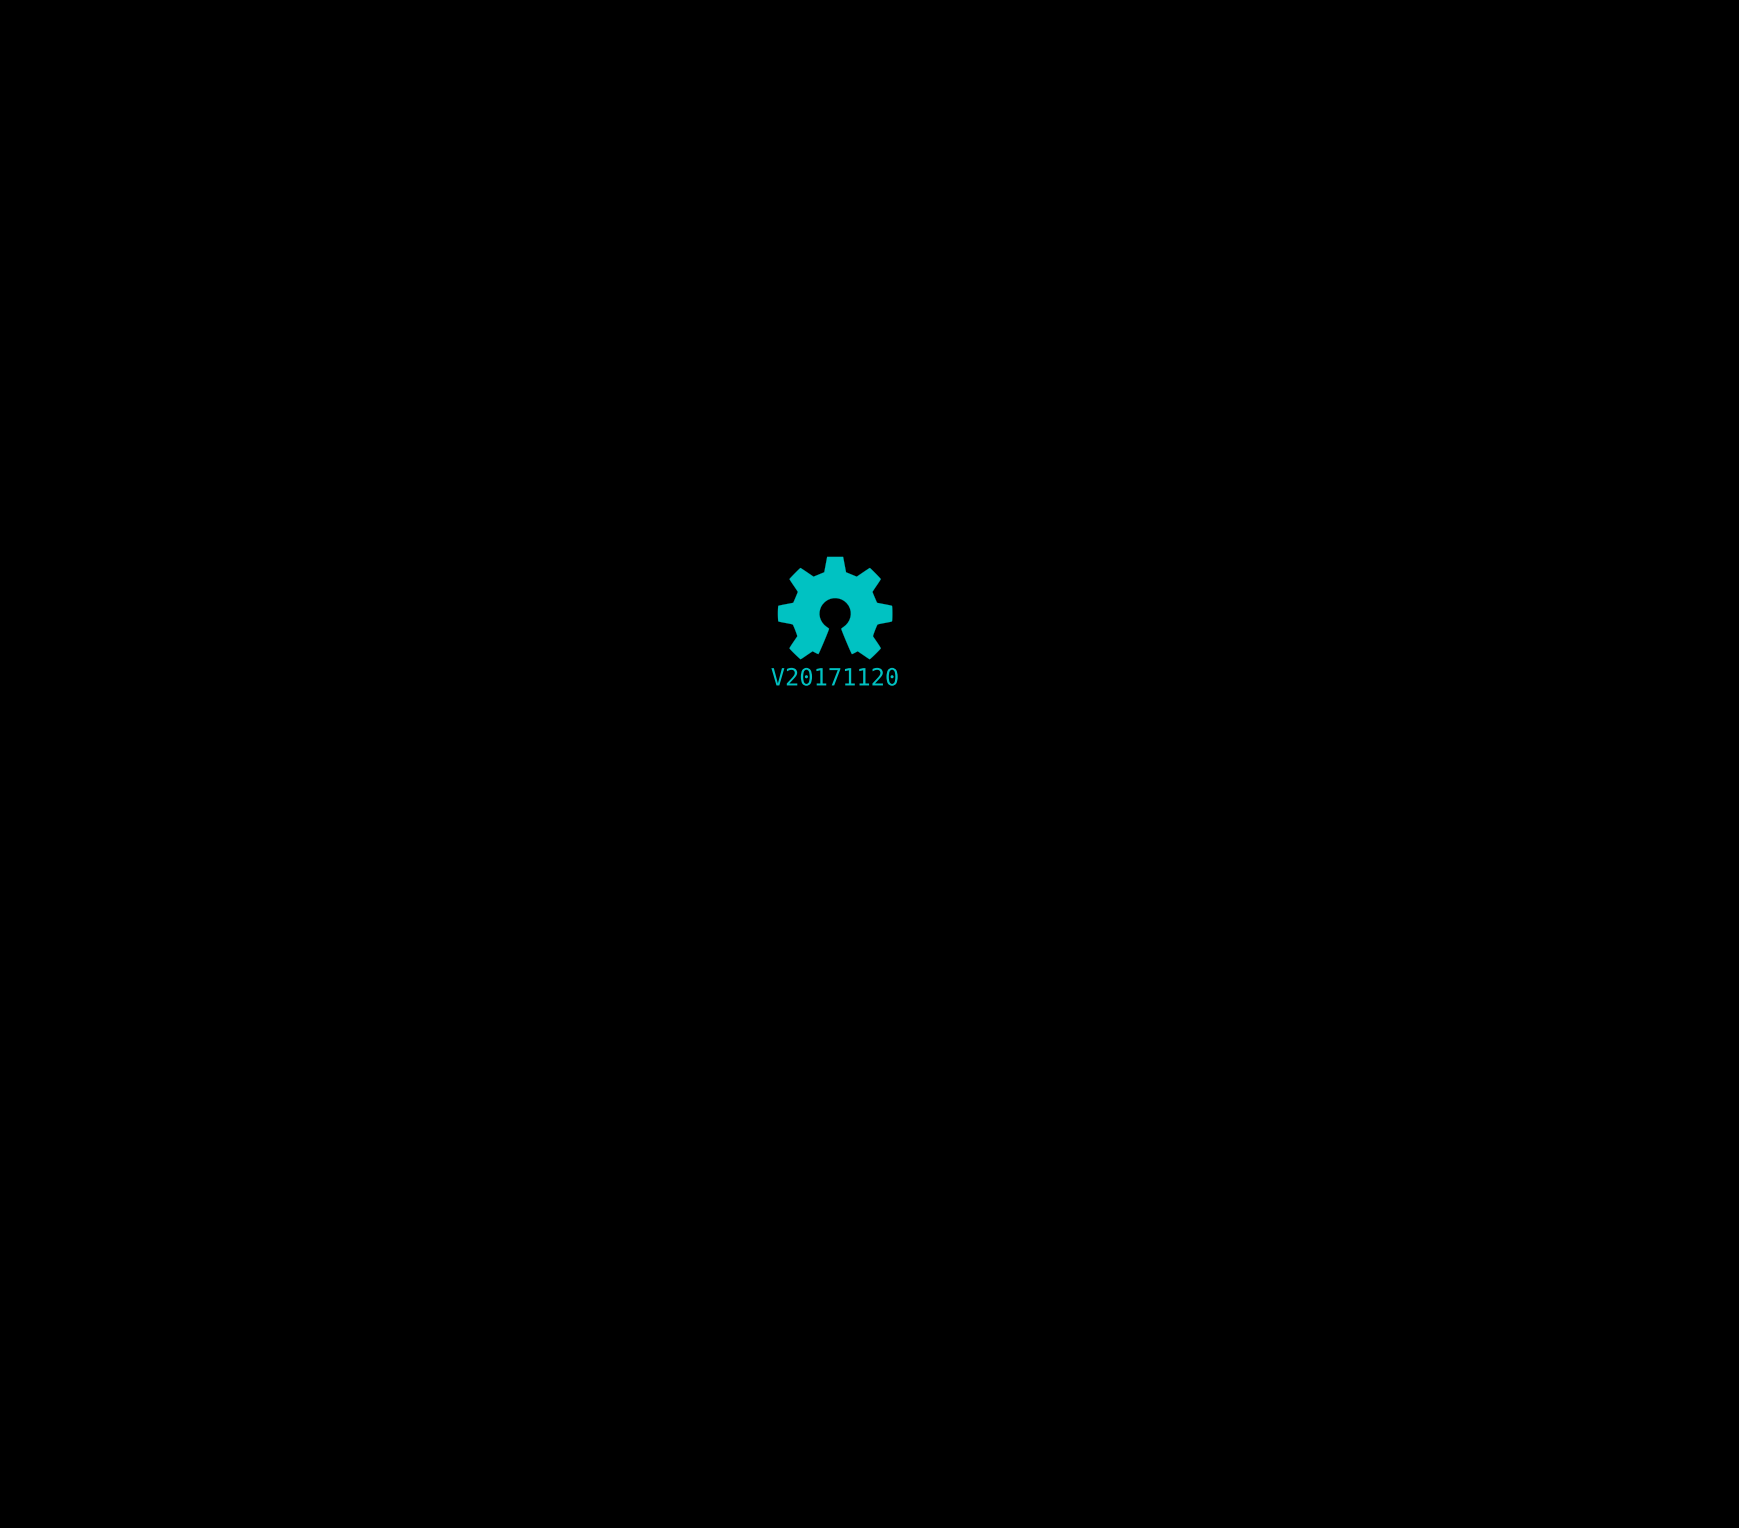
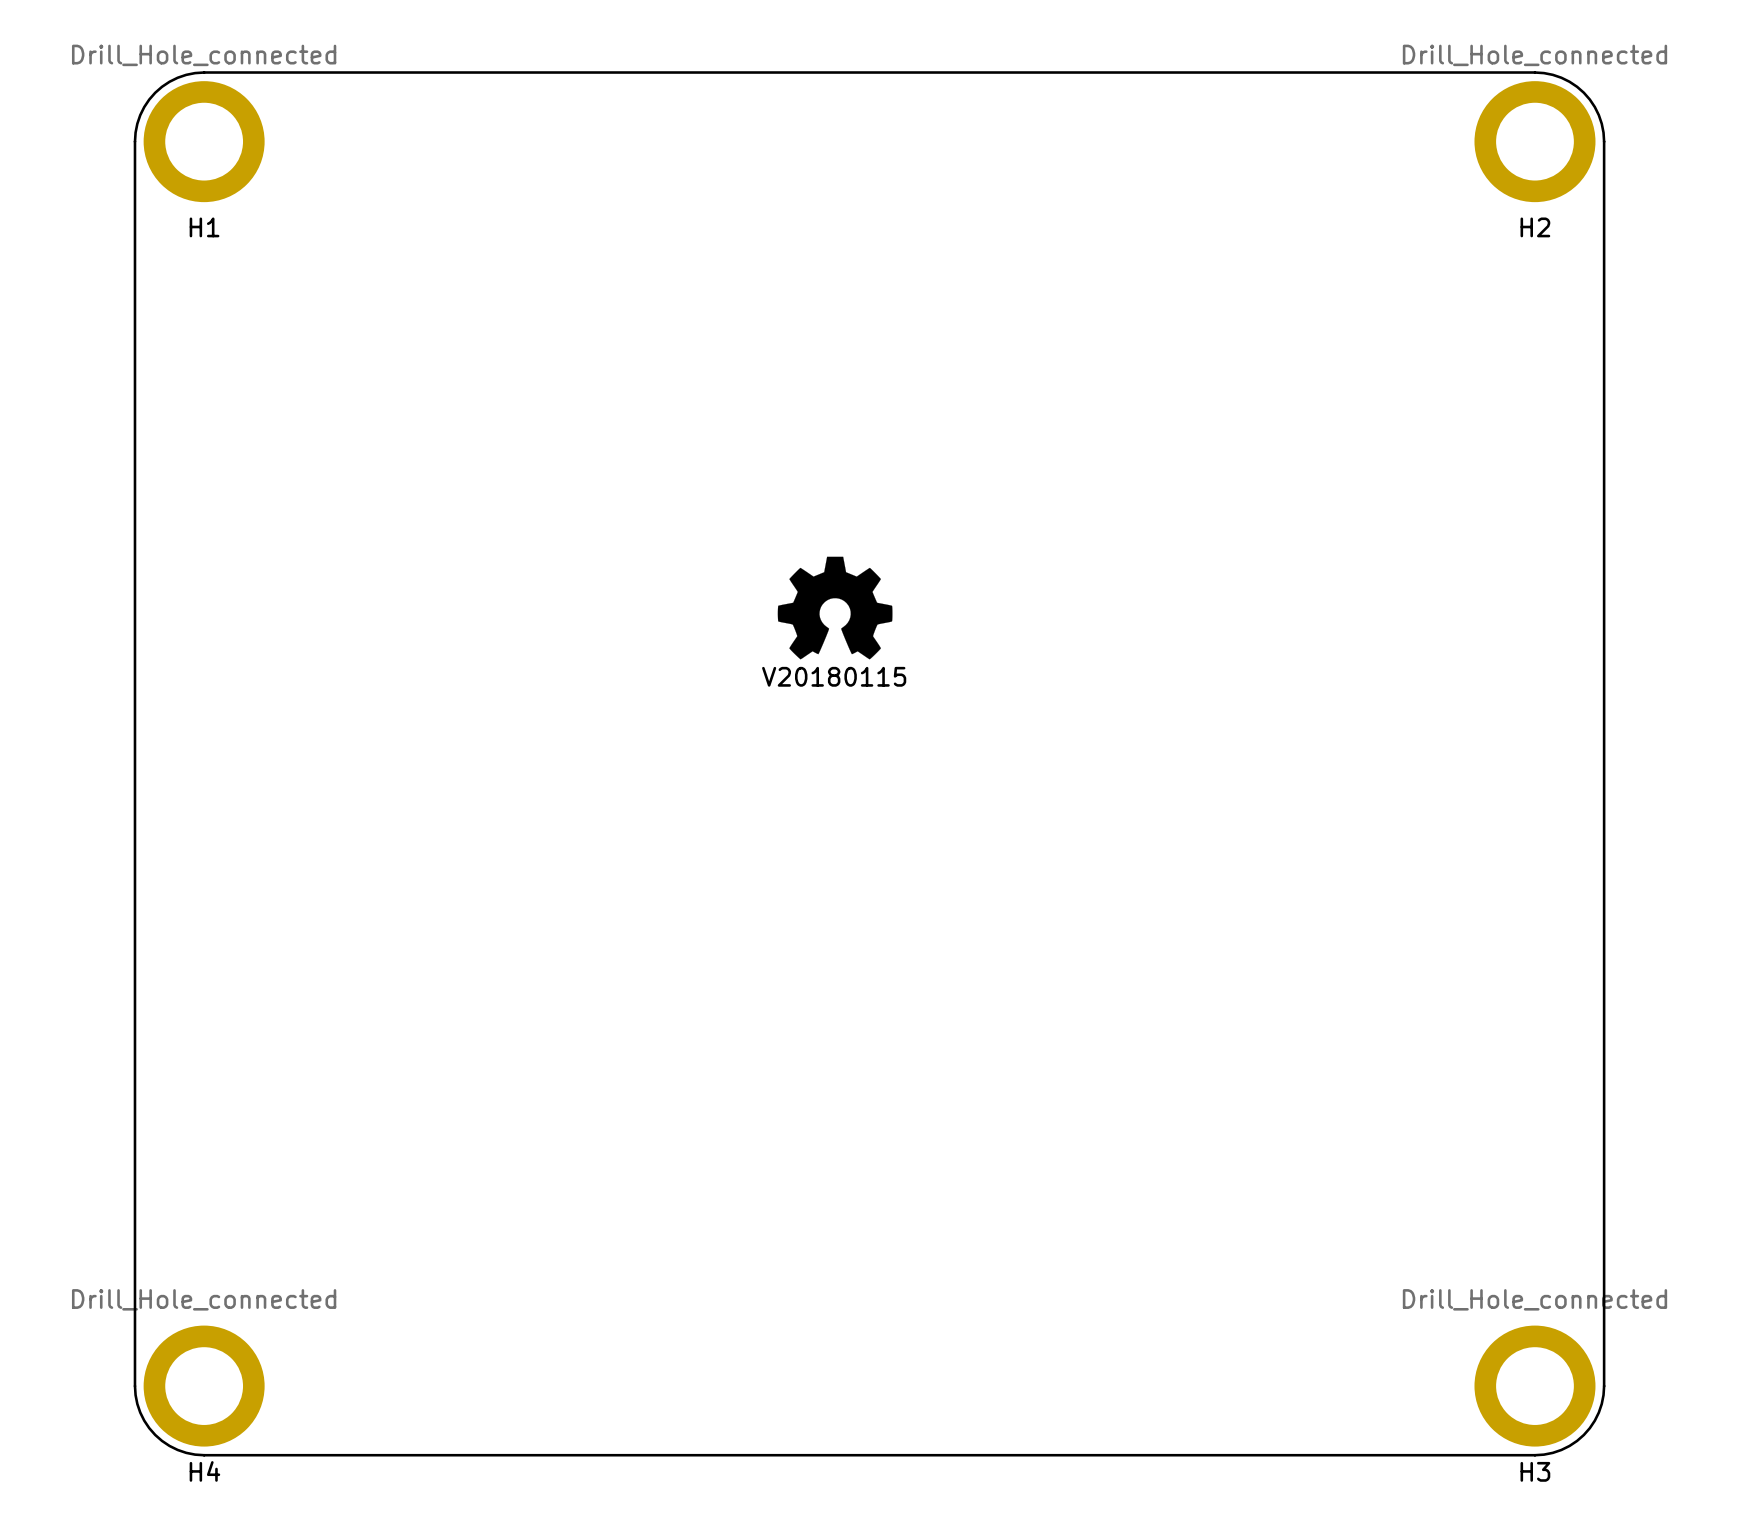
board edge: none -> (204, 72) (1534, 72) (1561, 77) (1583, 92) (1598, 115) (1604, 141) (1604, 1386) (1598, 1412) (1583, 1434) (1561, 1449) (1534, 1455) (204, 1455) (177, 1449) (155, 1434) (140, 1412) (134, 1386) (134, 141) (140, 115) (155, 92) (177, 77) (204, 72)
H1: none -> Drill_Hole_connected (204, 141)
H2: none -> Drill_Hole_connected (1534, 141)
drawing shape: [771, 667, 898, 686] -> [762, 666, 907, 687]
H4: none -> Drill_Hole_connected (204, 1386)
H3: none -> Drill_Hole_connected (1534, 1386)

